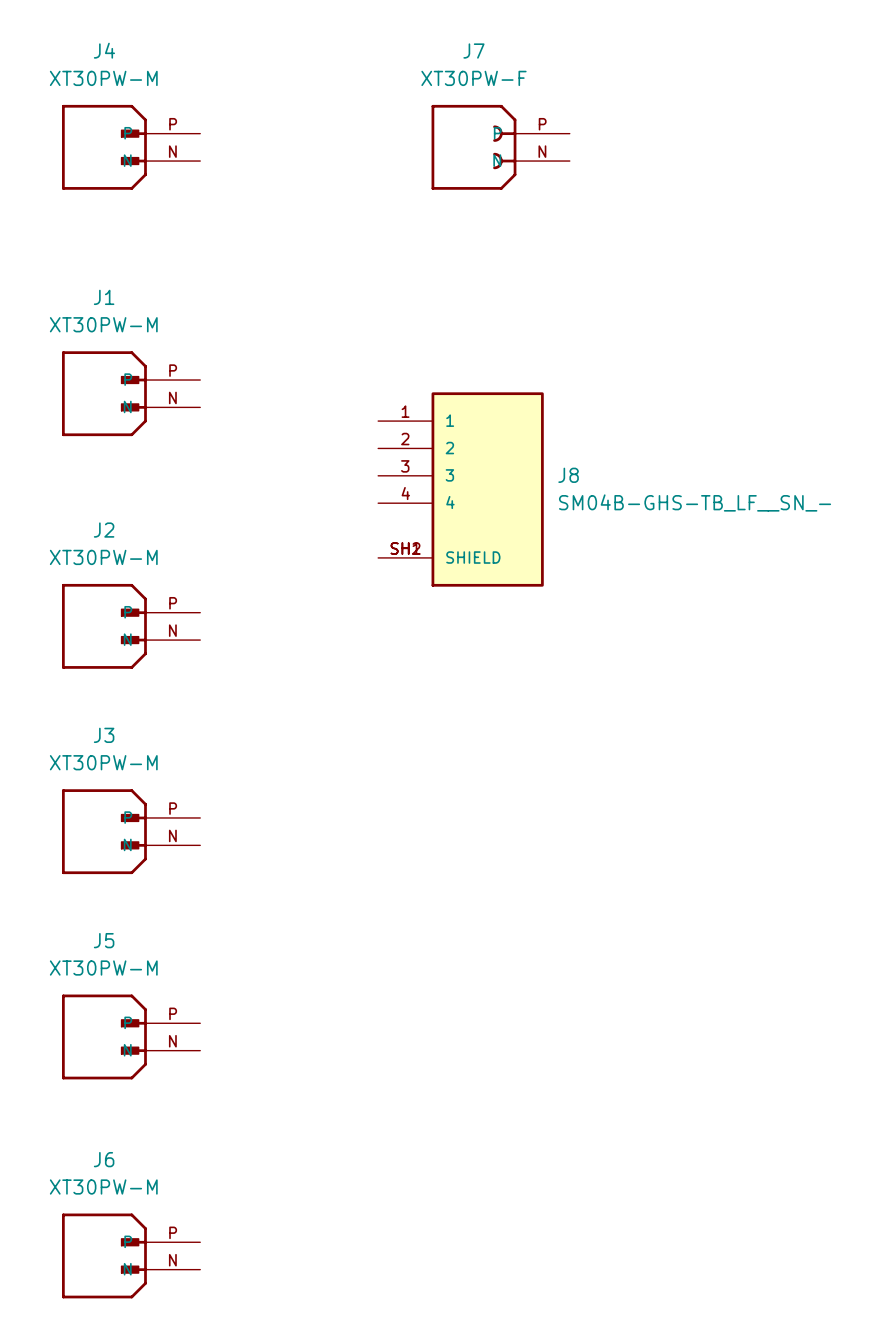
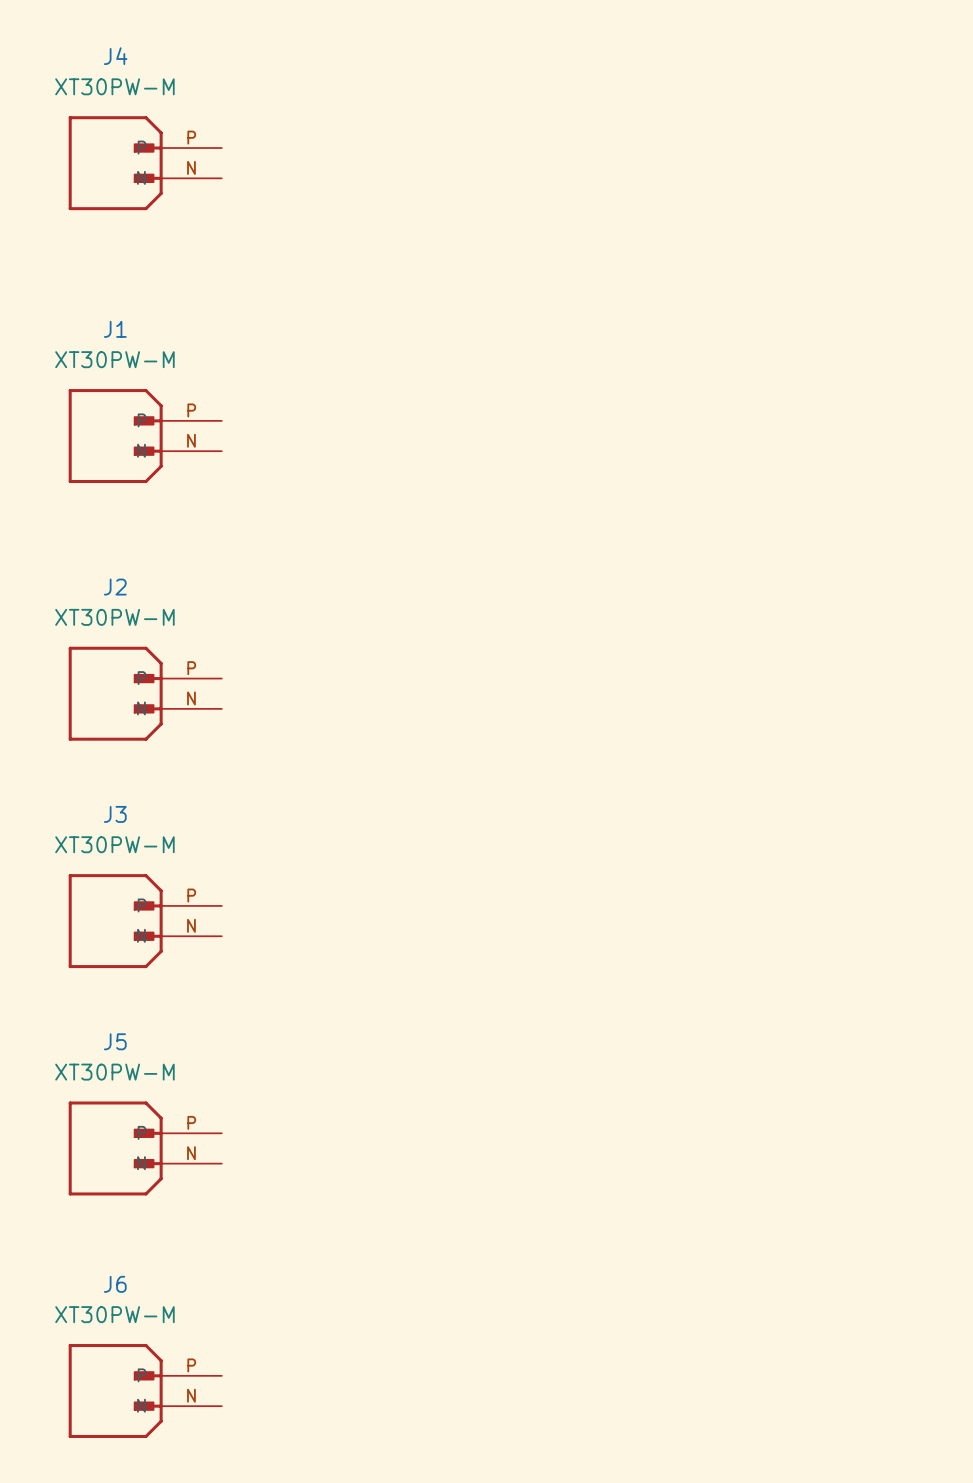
J7: XT30PW-F (500, 147) -> none
J8: SM04B-GHS-TB_LF__SN_- (460, 489) -> none

